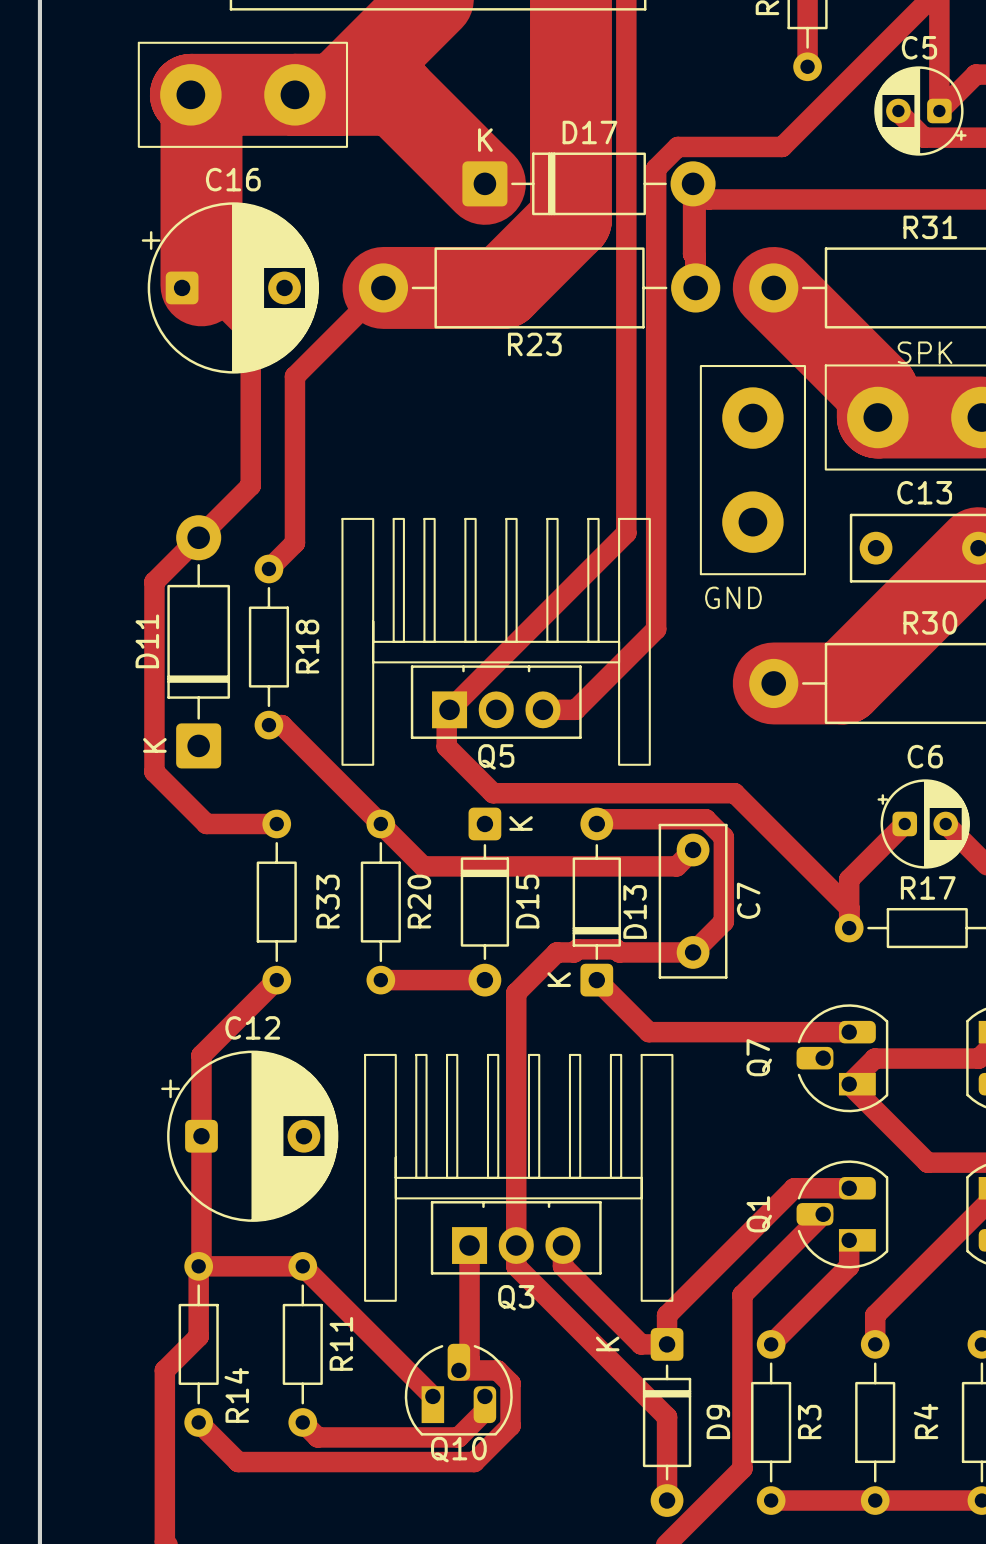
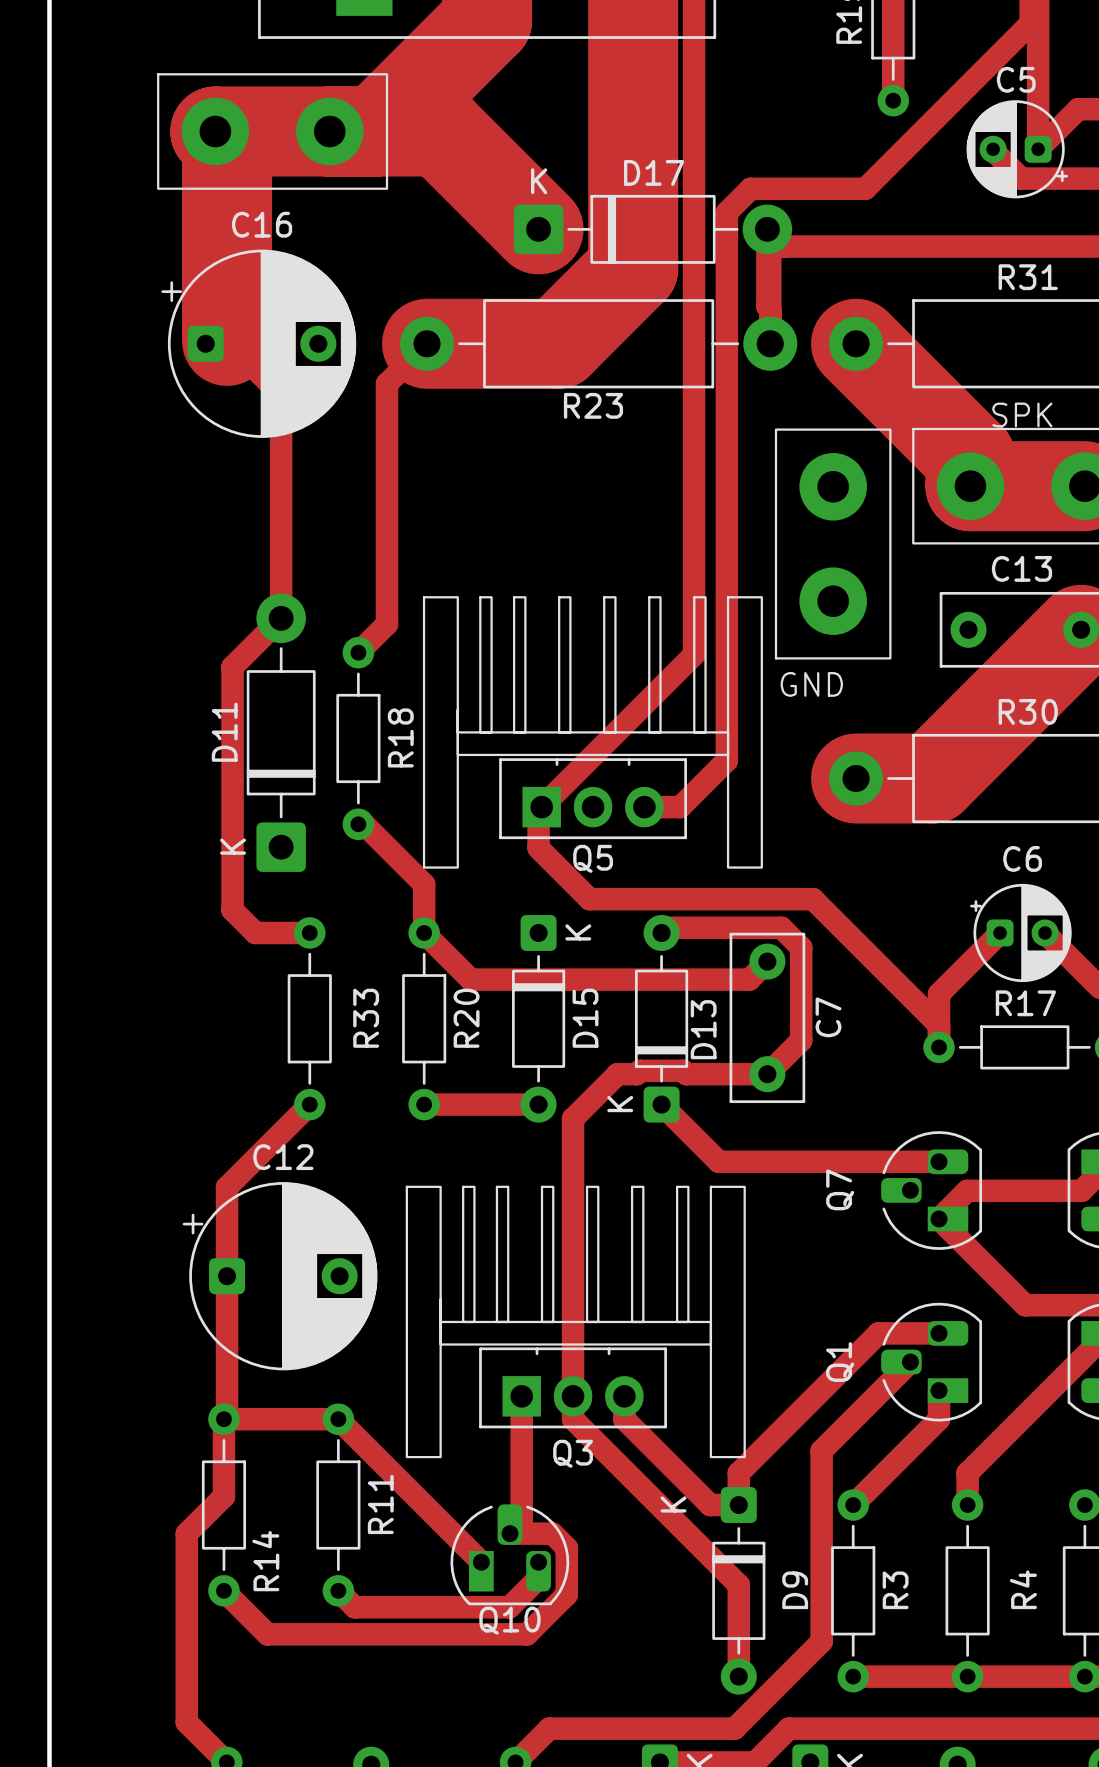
track: (347, 324) (294, 376) (294, 542) (268, 568) -> (386, 383) (386, 624) (358, 652)
track: (250, 485) (154, 581) (154, 771) (206, 823) (227, 823) -> (281, 561) (281, 618) (232, 666) (232, 910) (255, 932)
track: (626, 533) (446, 712) (446, 746) (493, 793) (531, 793) -> (694, 613) (694, 654) (538, 810) (538, 847)
track: (656, 629) (575, 709) (542, 709) -> (726, 718) (726, 760) (680, 807) (644, 807)
D11 position: (198, 641) -> (281, 732)
drawing position: (496, 641) -> (592, 732)
R18 position: (268, 647) -> (358, 738)
Q5 position: (496, 702) -> (593, 798)
track: (268, 725) (281, 725) (380, 823) -> (358, 824) (364, 824) (424, 884) (424, 932)
track: none -> (538, 848) (589, 899)

